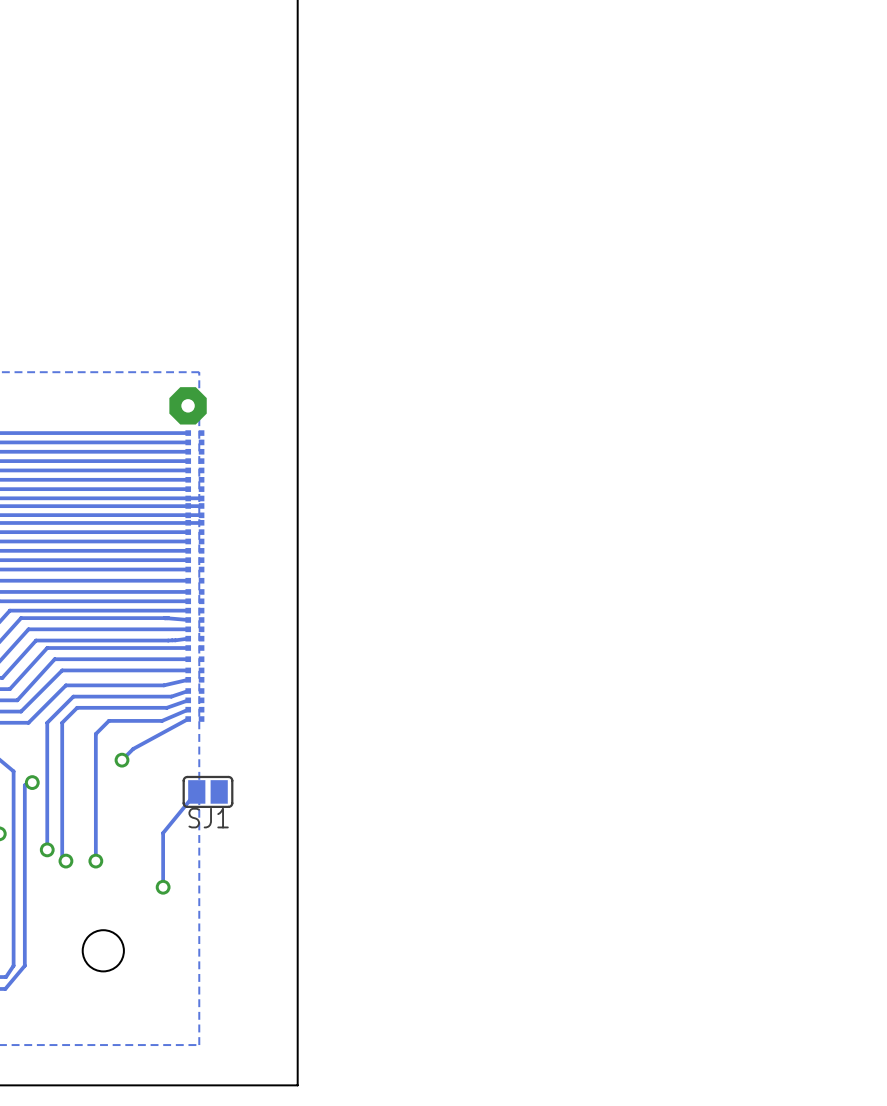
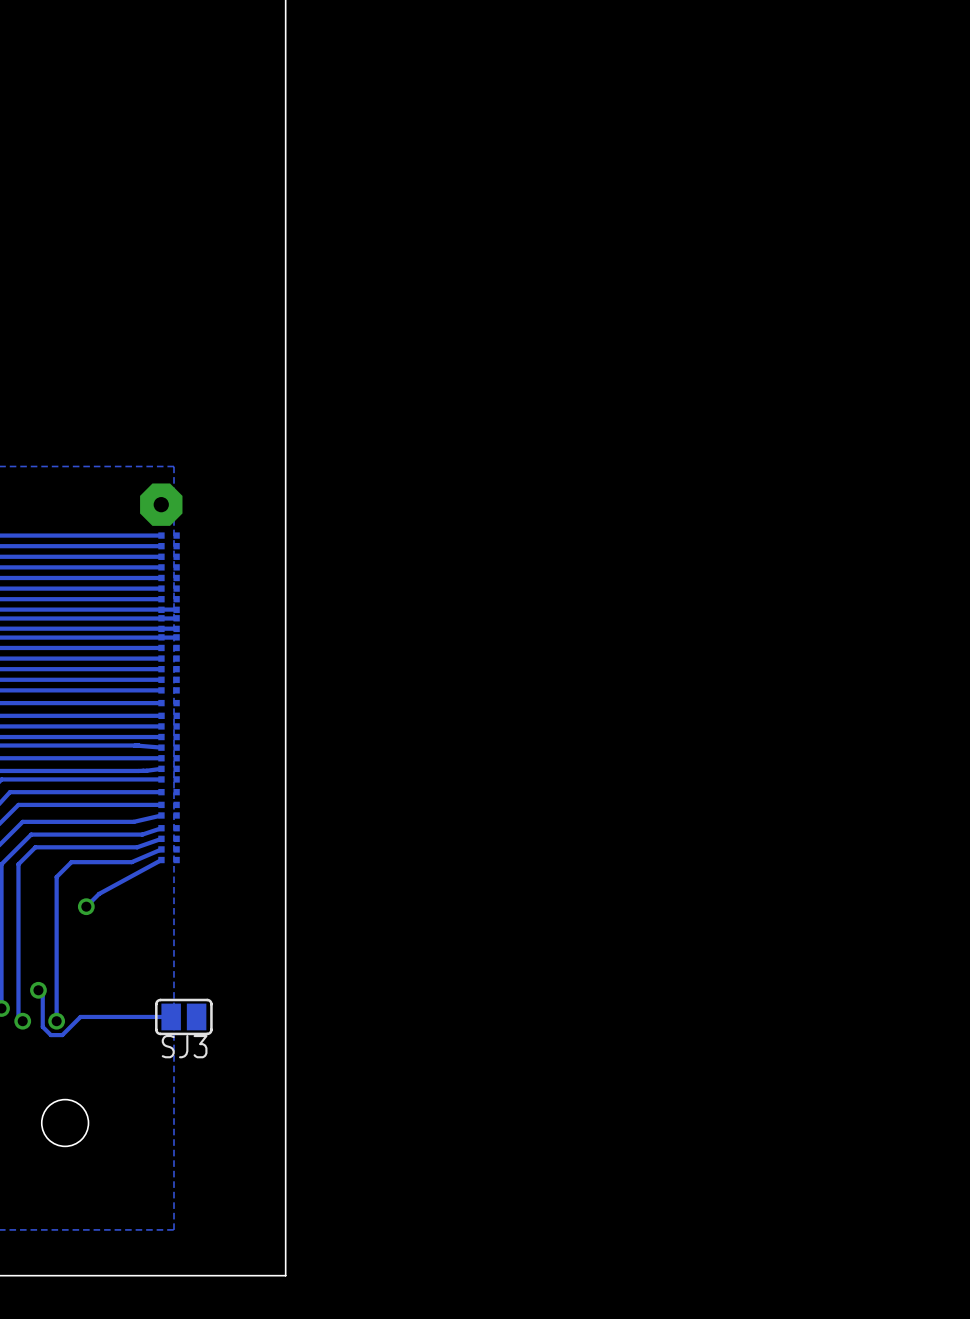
track: (196, 791) (163, 833) (163, 887) -> none
SJ1: (207, 791) -> none
track: none -> (38, 990) (42, 994) (42, 1026) (50, 1035) (62, 1035) (80, 1016) (171, 1016)
via: none -> (38, 990)
SJ3: none -> (183, 1016)
via: (163, 887) -> none

